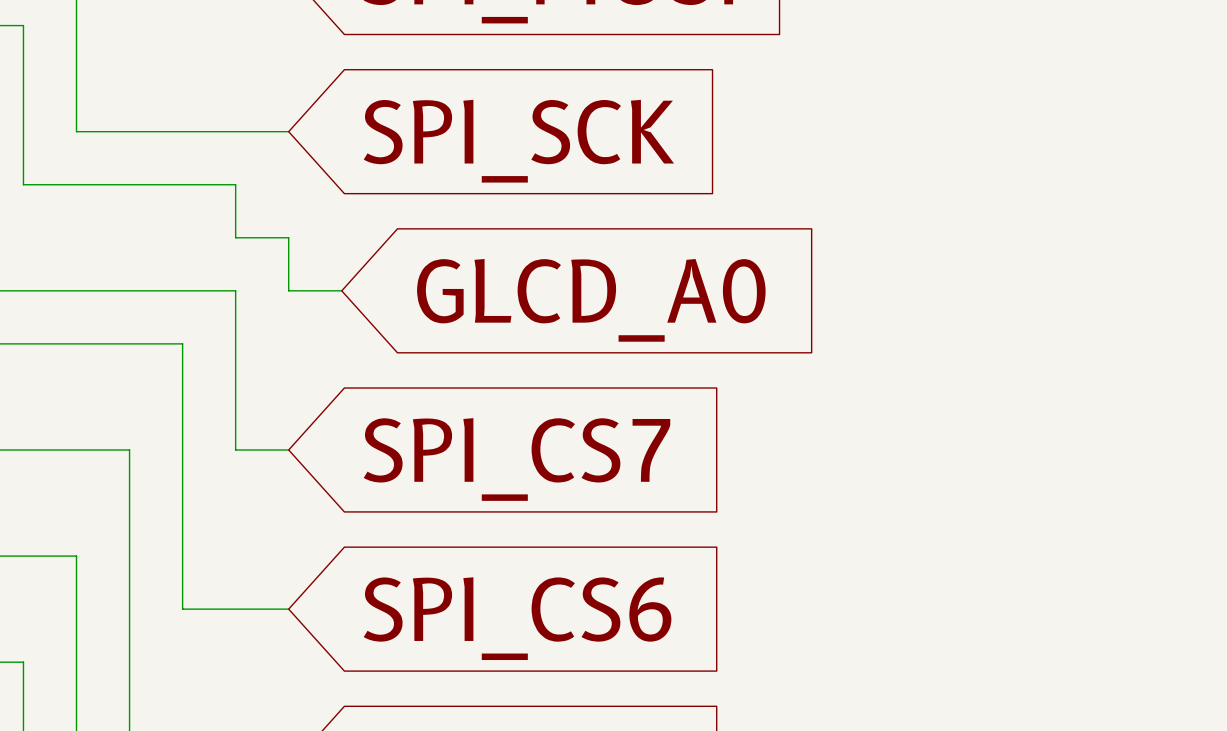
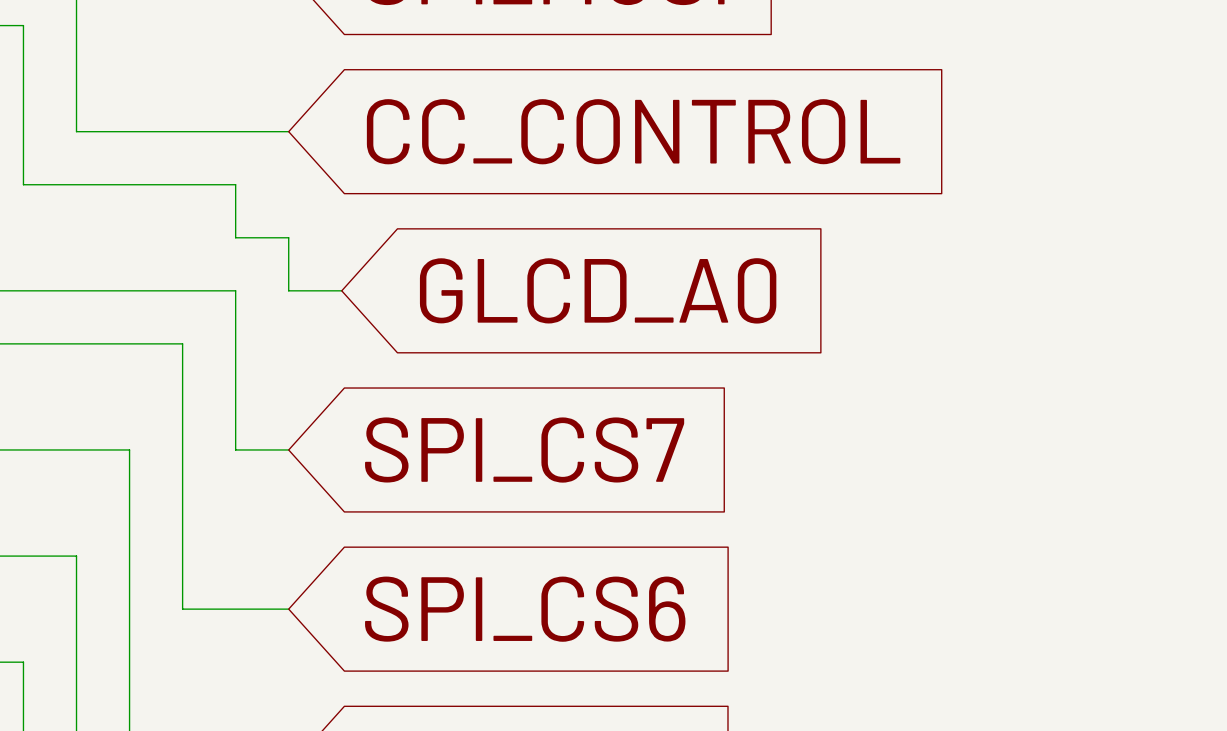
global label: SPI_SCK (518, 141) -> CC_CONTROL (633, 131)

